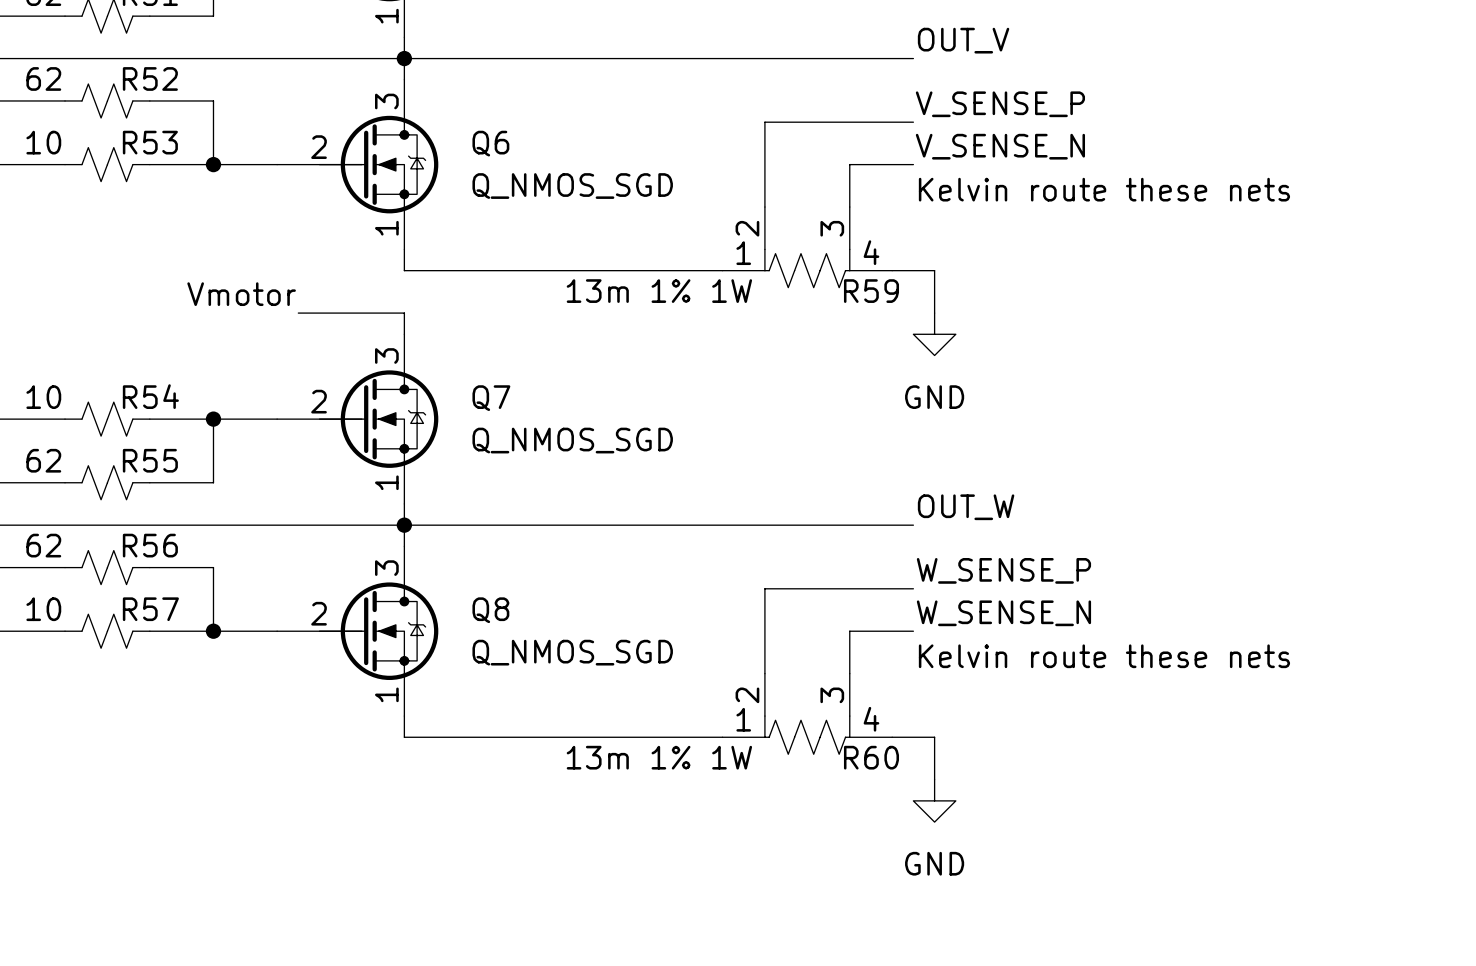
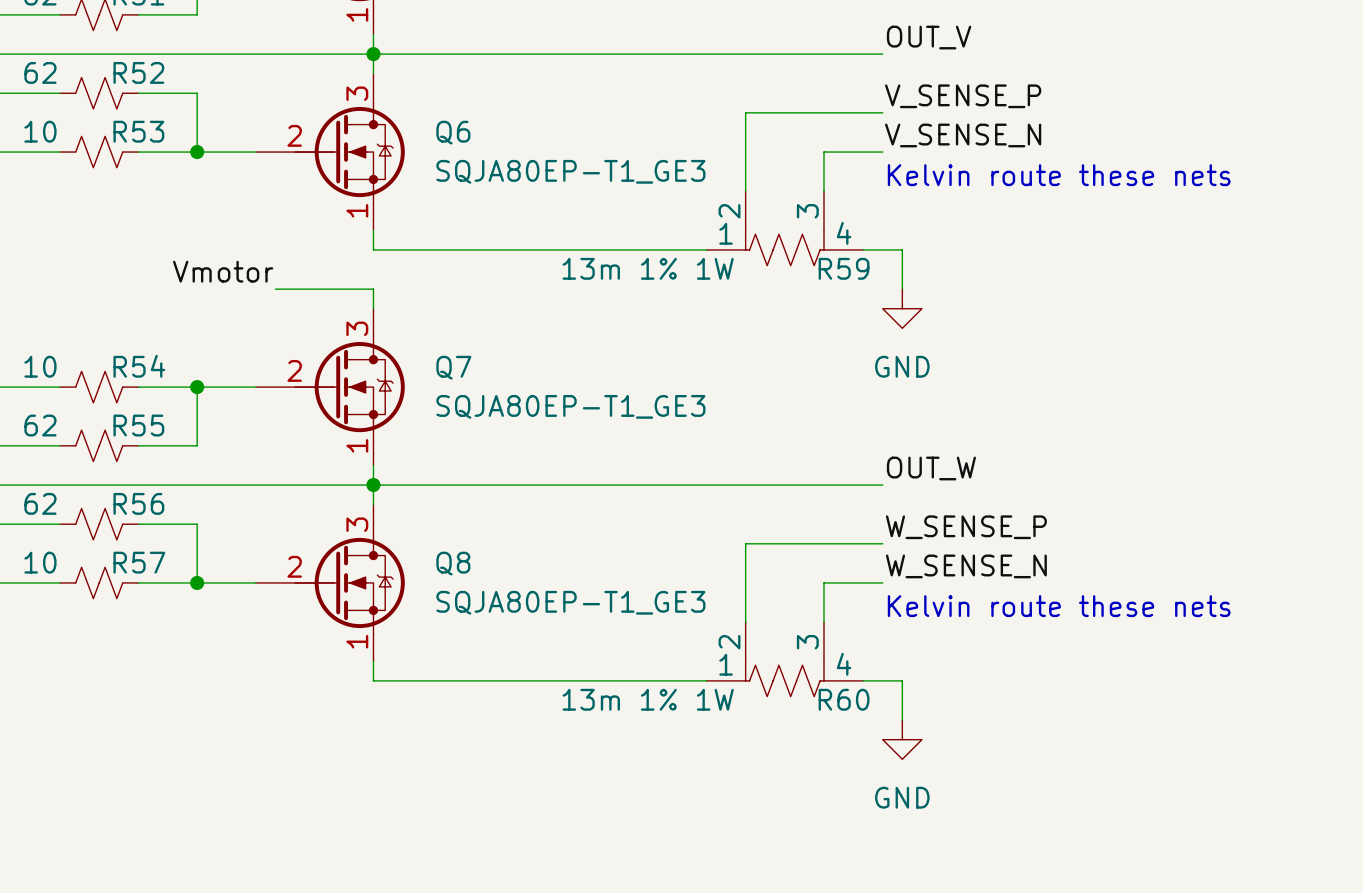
label position: OUT_V (963, 40) -> OUT_V (929, 37)
wire: none -> (843, 54) (882, 54)
label position: V_SENSE_P (1000, 104) -> V_SENSE_P (963, 96)
wire: (807, 122) (764, 122) (764, 207) -> (745, 112) (745, 191)
wire: none -> (843, 112) (882, 112)
label position: V_SENSE_N (1000, 146) -> V_SENSE_N (963, 135)
wire: (892, 164) (849, 164) (849, 207) -> (823, 152) (823, 191)
wire: none -> (843, 152) (882, 152)
Q6 value: Q_NMOS_SGD (572, 186) -> SQJA80EP-T1_GE3 (570, 171)
text position: Kelvin route these nets (1104, 189) -> Kelvin route these nets (1059, 175)
R59 position: (807, 247) -> (784, 228)
wire: (892, 270) (934, 270) (934, 313) -> (863, 249) (902, 249) (902, 289)
power symbol position: GND (934, 334) -> GND (902, 308)
Q7 value: Q_NMOS_SGD (572, 440) -> SQJA80EP-T1_GE3 (570, 406)
label position: OUT_W (966, 507) -> OUT_W (931, 468)
wire: none -> (843, 485) (882, 485)
label position: W_SENSE_P (1003, 570) -> W_SENSE_P (966, 527)
wire: (807, 588) (764, 588) (764, 673) -> (745, 543) (745, 622)
wire: none -> (843, 543) (882, 543)
label position: W_SENSE_N (1003, 613) -> W_SENSE_N (966, 566)
wire: (892, 631) (849, 631) (849, 673) -> (823, 582) (823, 622)
wire: none -> (843, 582) (882, 582)
Q8 value: Q_NMOS_SGD (572, 652) -> SQJA80EP-T1_GE3 (570, 602)
text position: Kelvin route these nets (1104, 656) -> Kelvin route these nets (1059, 606)
R60 position: (807, 713) -> (784, 659)
wire: (892, 737) (934, 737) (934, 779) -> (863, 680) (902, 680) (902, 720)
power symbol position: GND (934, 800) -> GND (902, 739)

